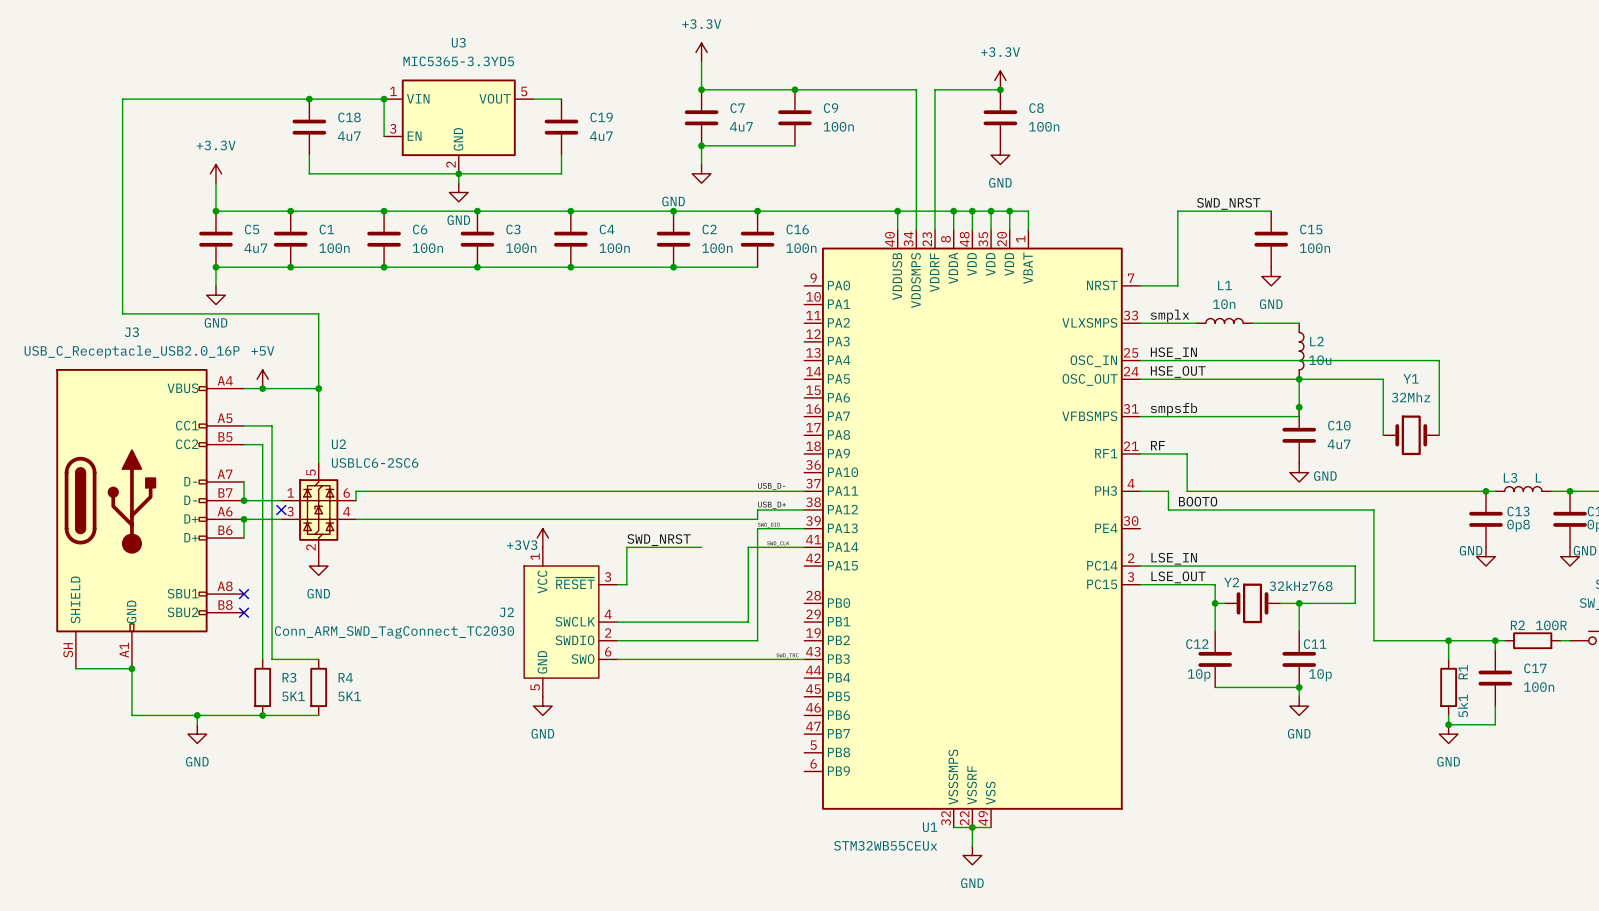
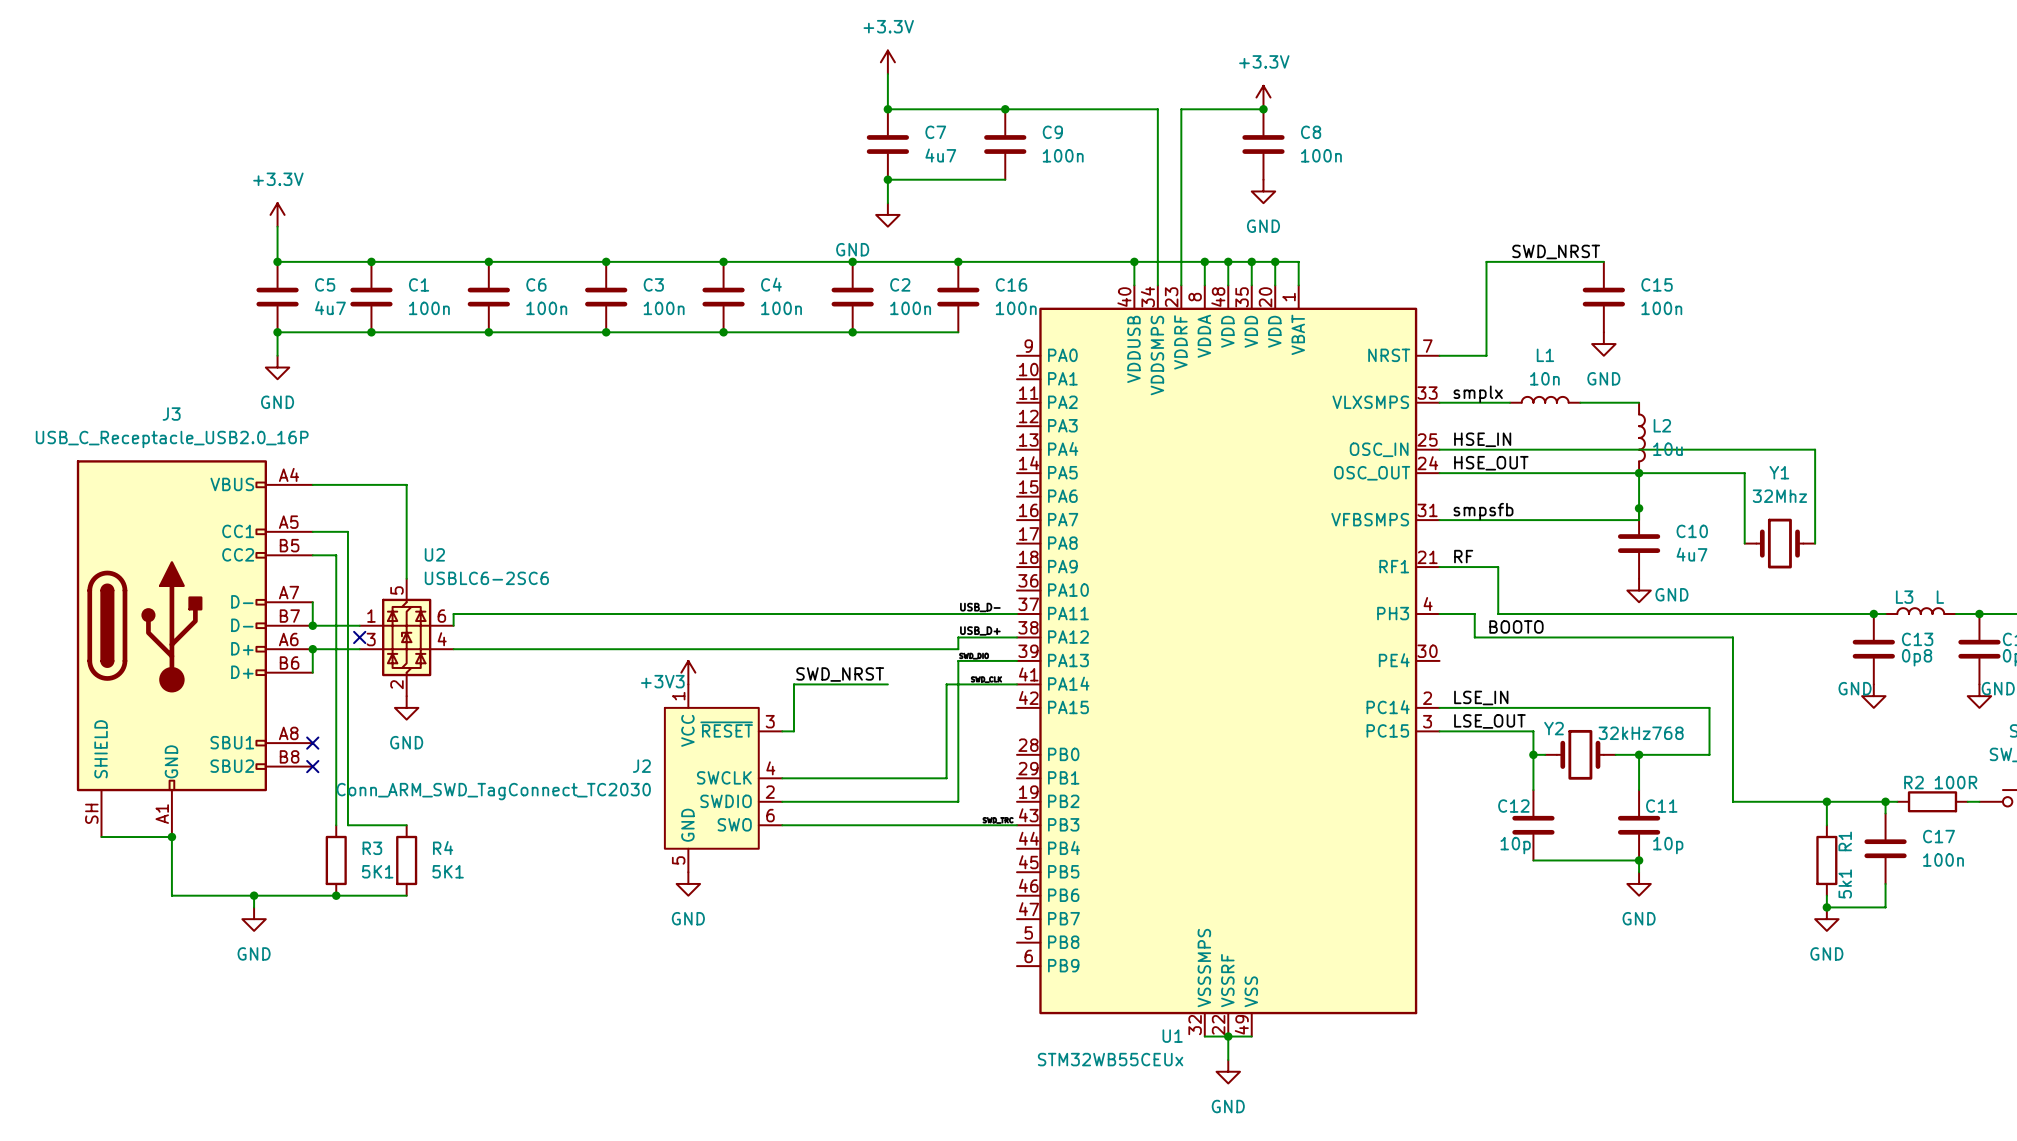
junction: (309, 99) -> none
junction: (384, 99) -> none
wire: (533, 99) (561, 99) -> none
U3: MIC5365-3.3YD5 (458, 126) -> none
C18: 4u7 (309, 127) -> none
C19: 4u7 (561, 127) -> none
wire: (384, 136) (384, 99) (122, 99) (122, 313) (318, 313) (318, 388) -> none
wire: (309, 155) (309, 173) (561, 173) (561, 155) -> none
wire: (458, 173) (458, 183) -> none
junction: (458, 173) -> none
power symbol: GND (458, 192) -> none
power symbol: +5V (262, 379) -> none
junction: (262, 388) -> none
junction: (318, 388) -> none

